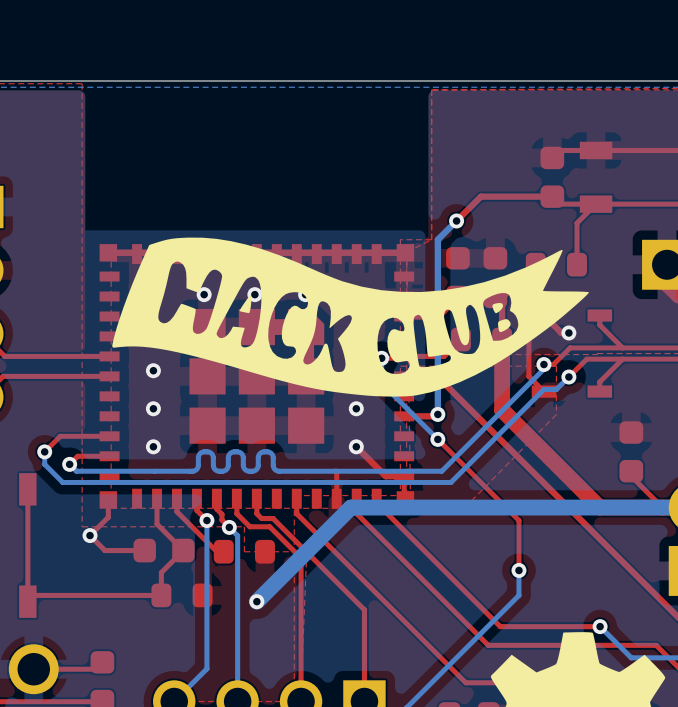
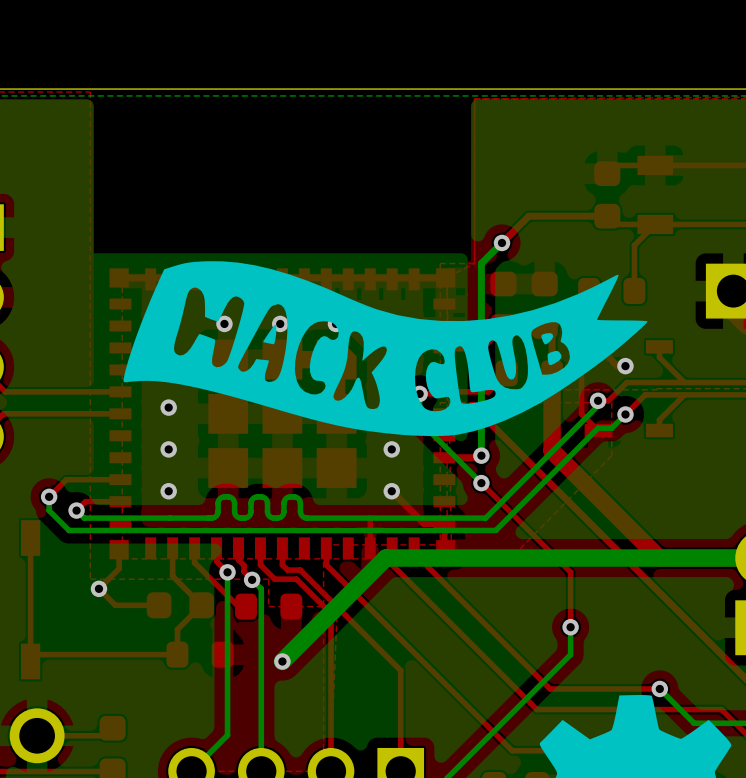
part: (631, 451) -> none
top track: (631, 471) (631, 476) (662, 507) -> none

